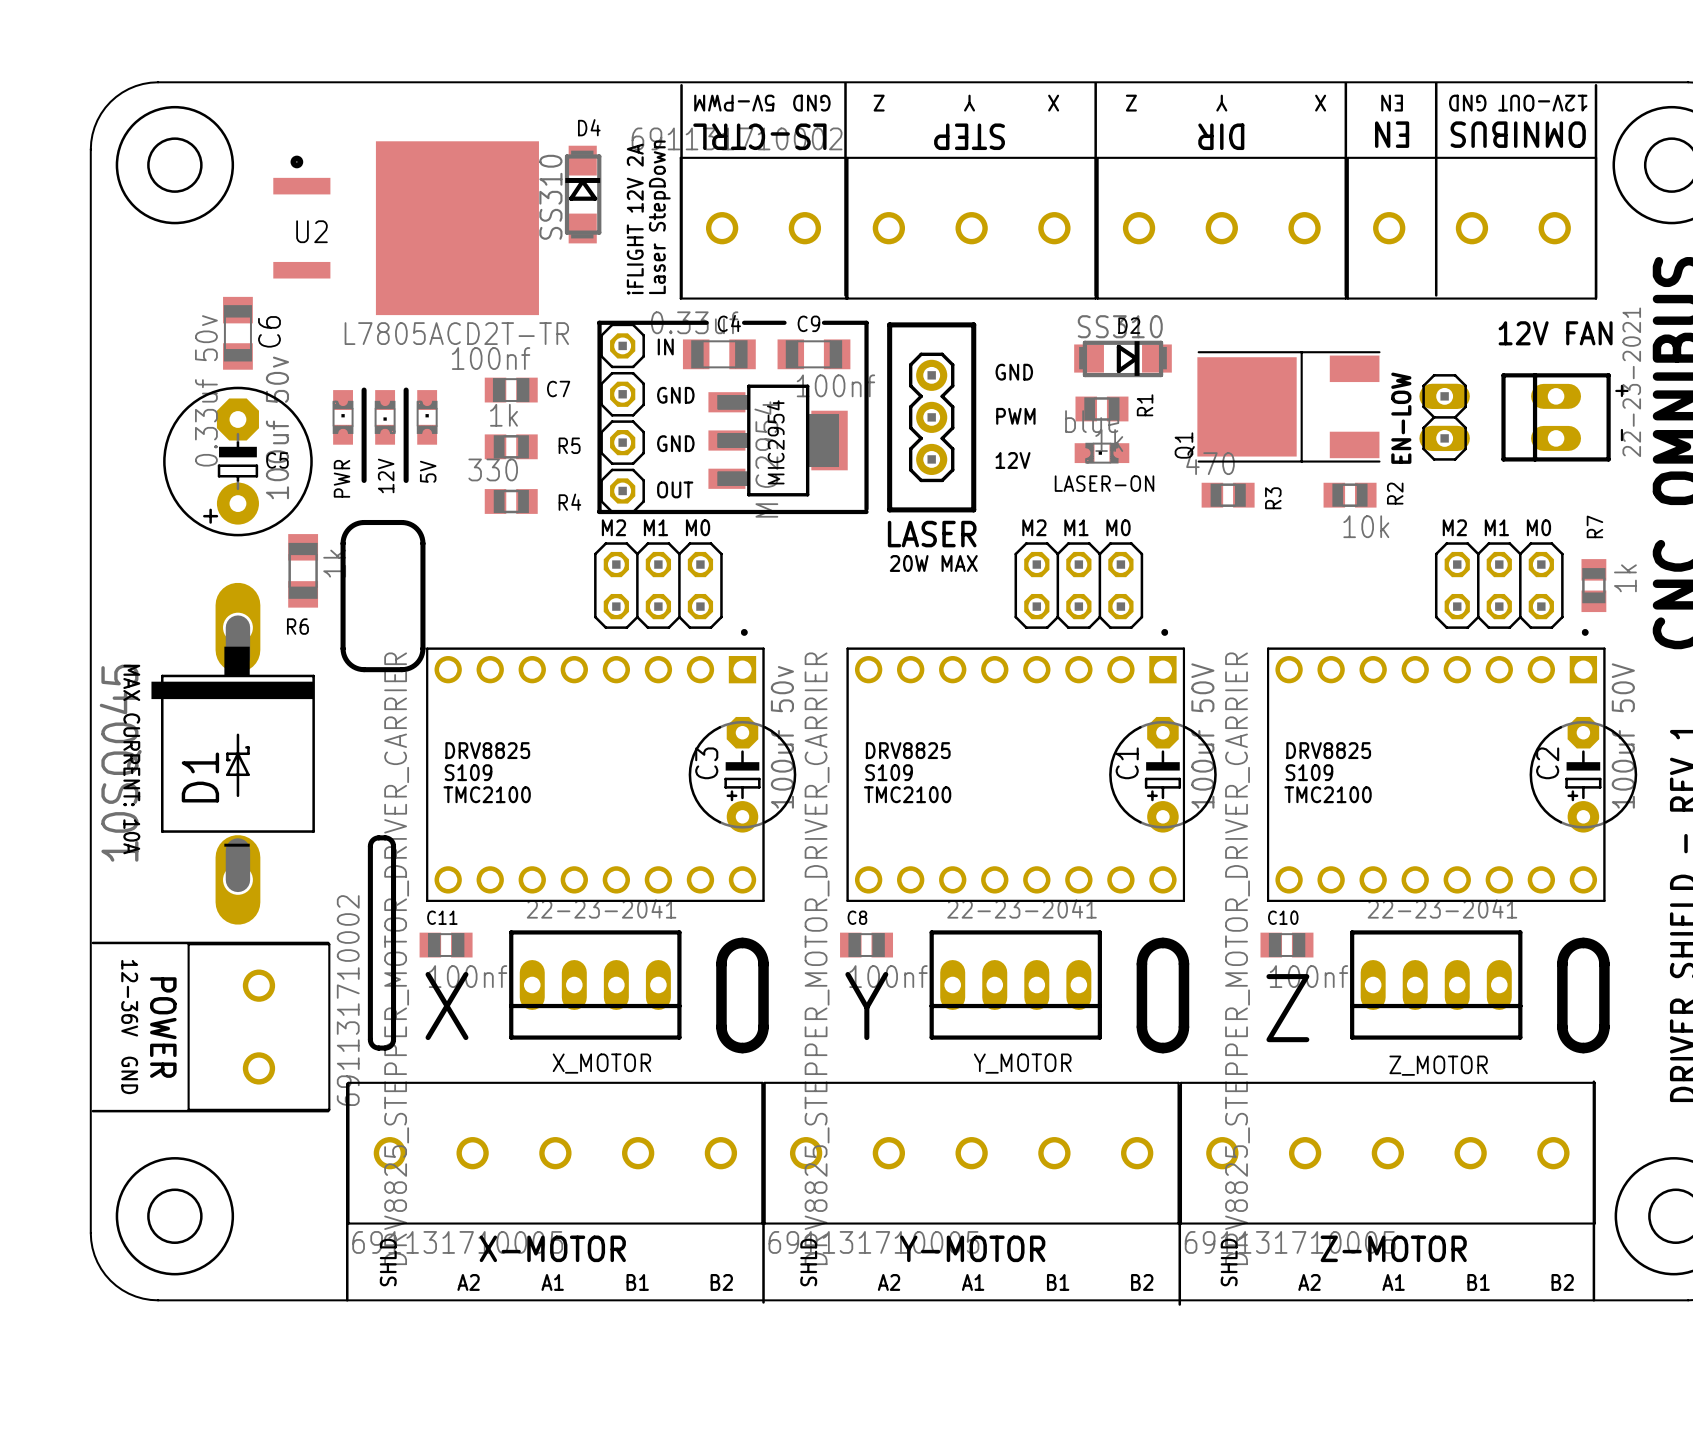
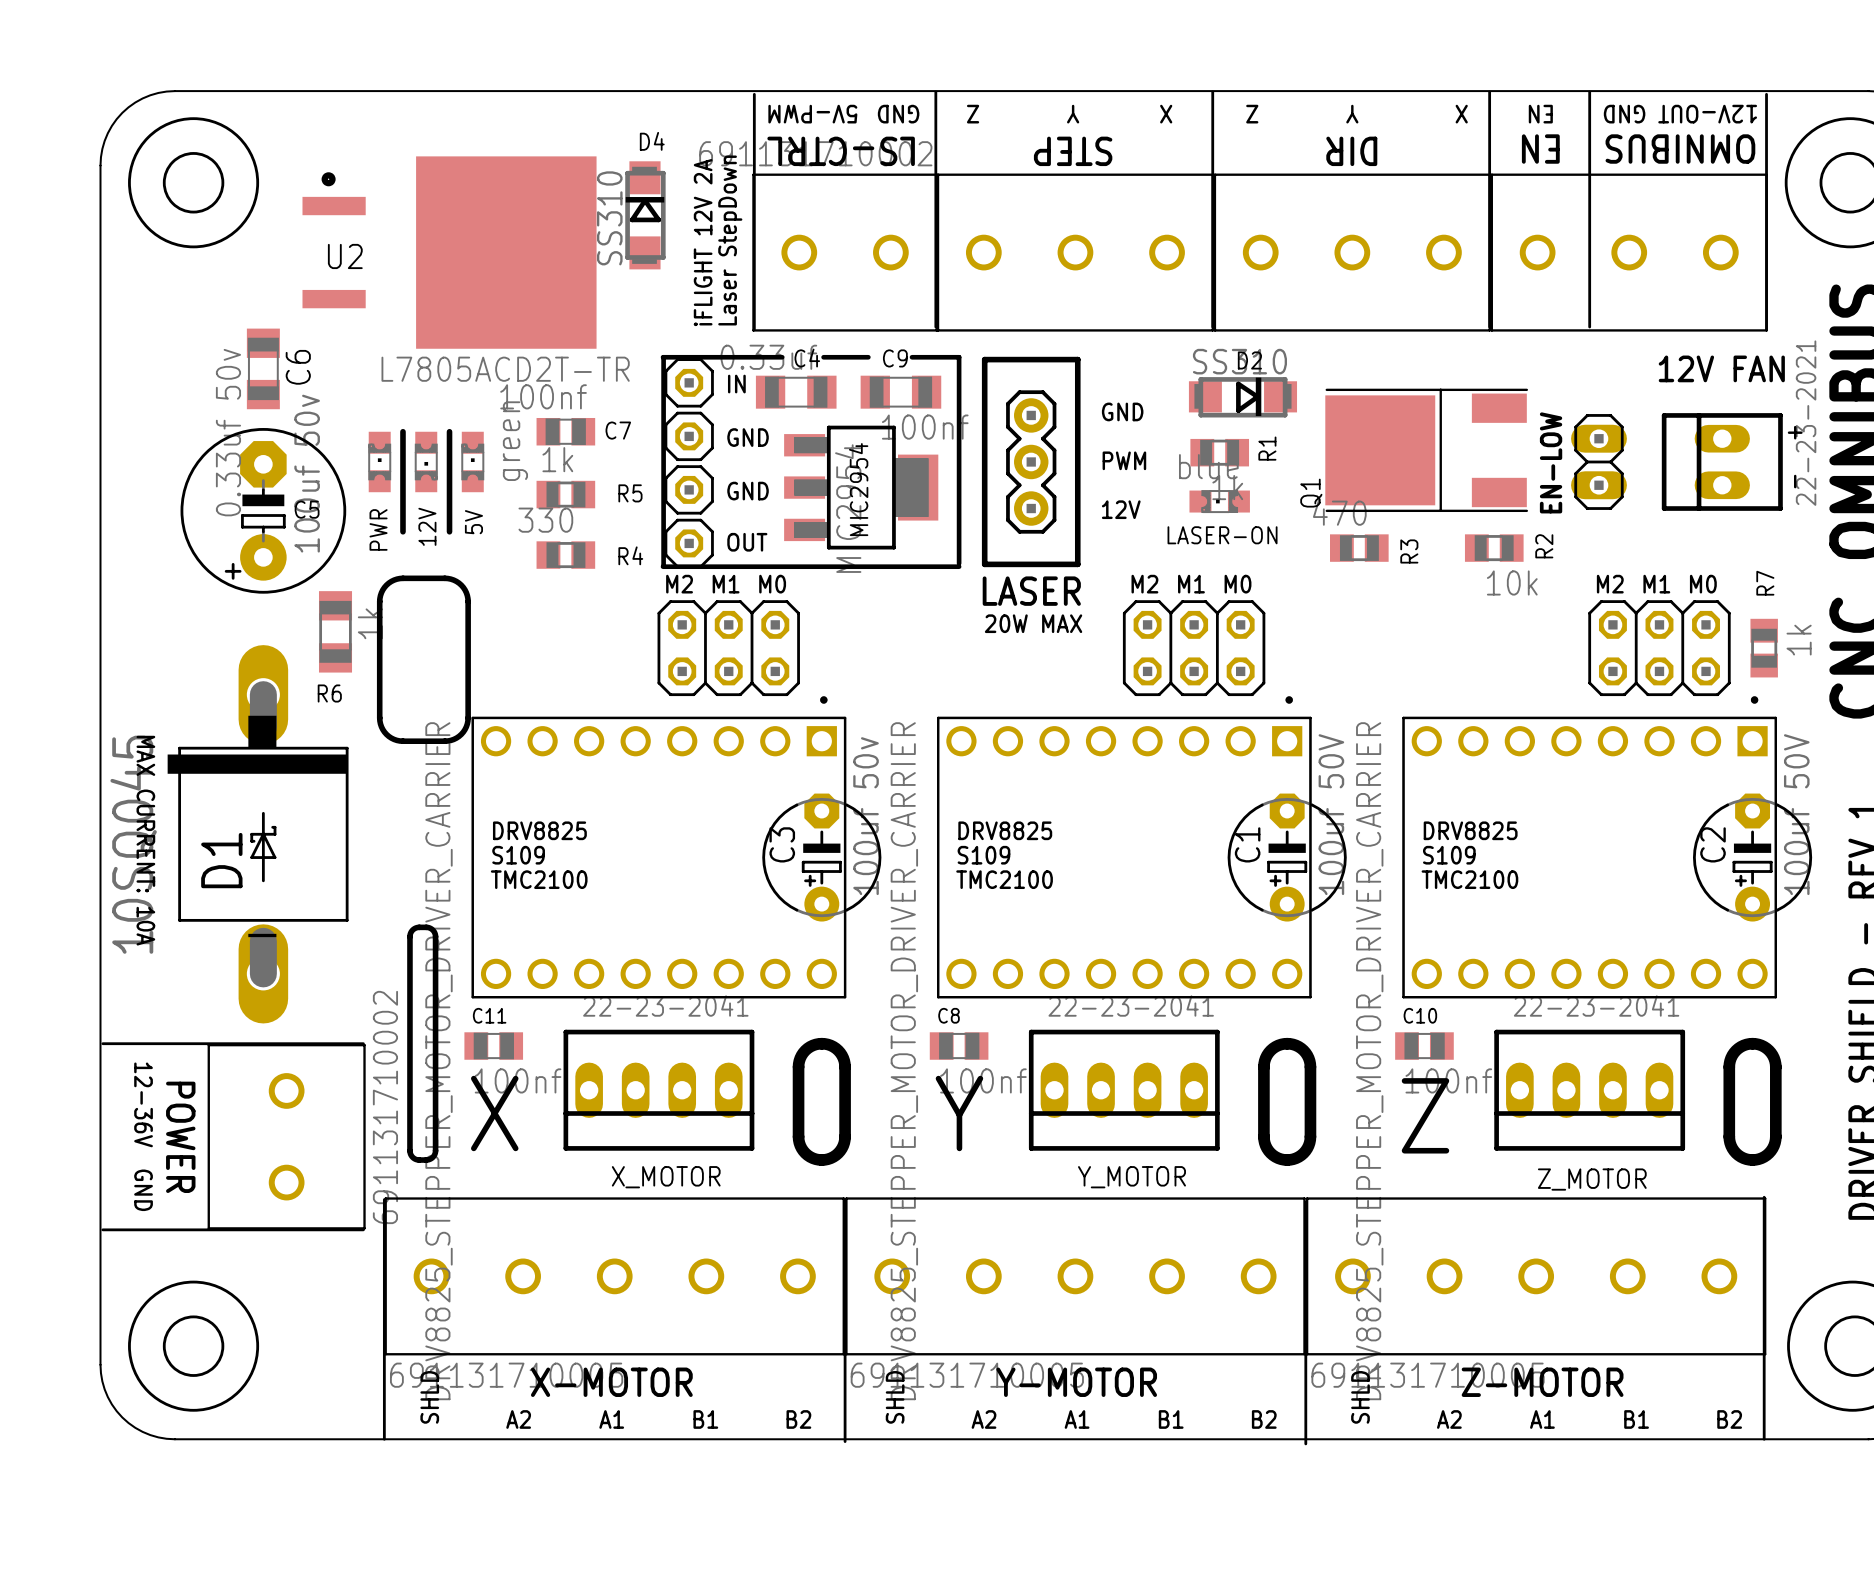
5V value: none -> green (515, 441)

